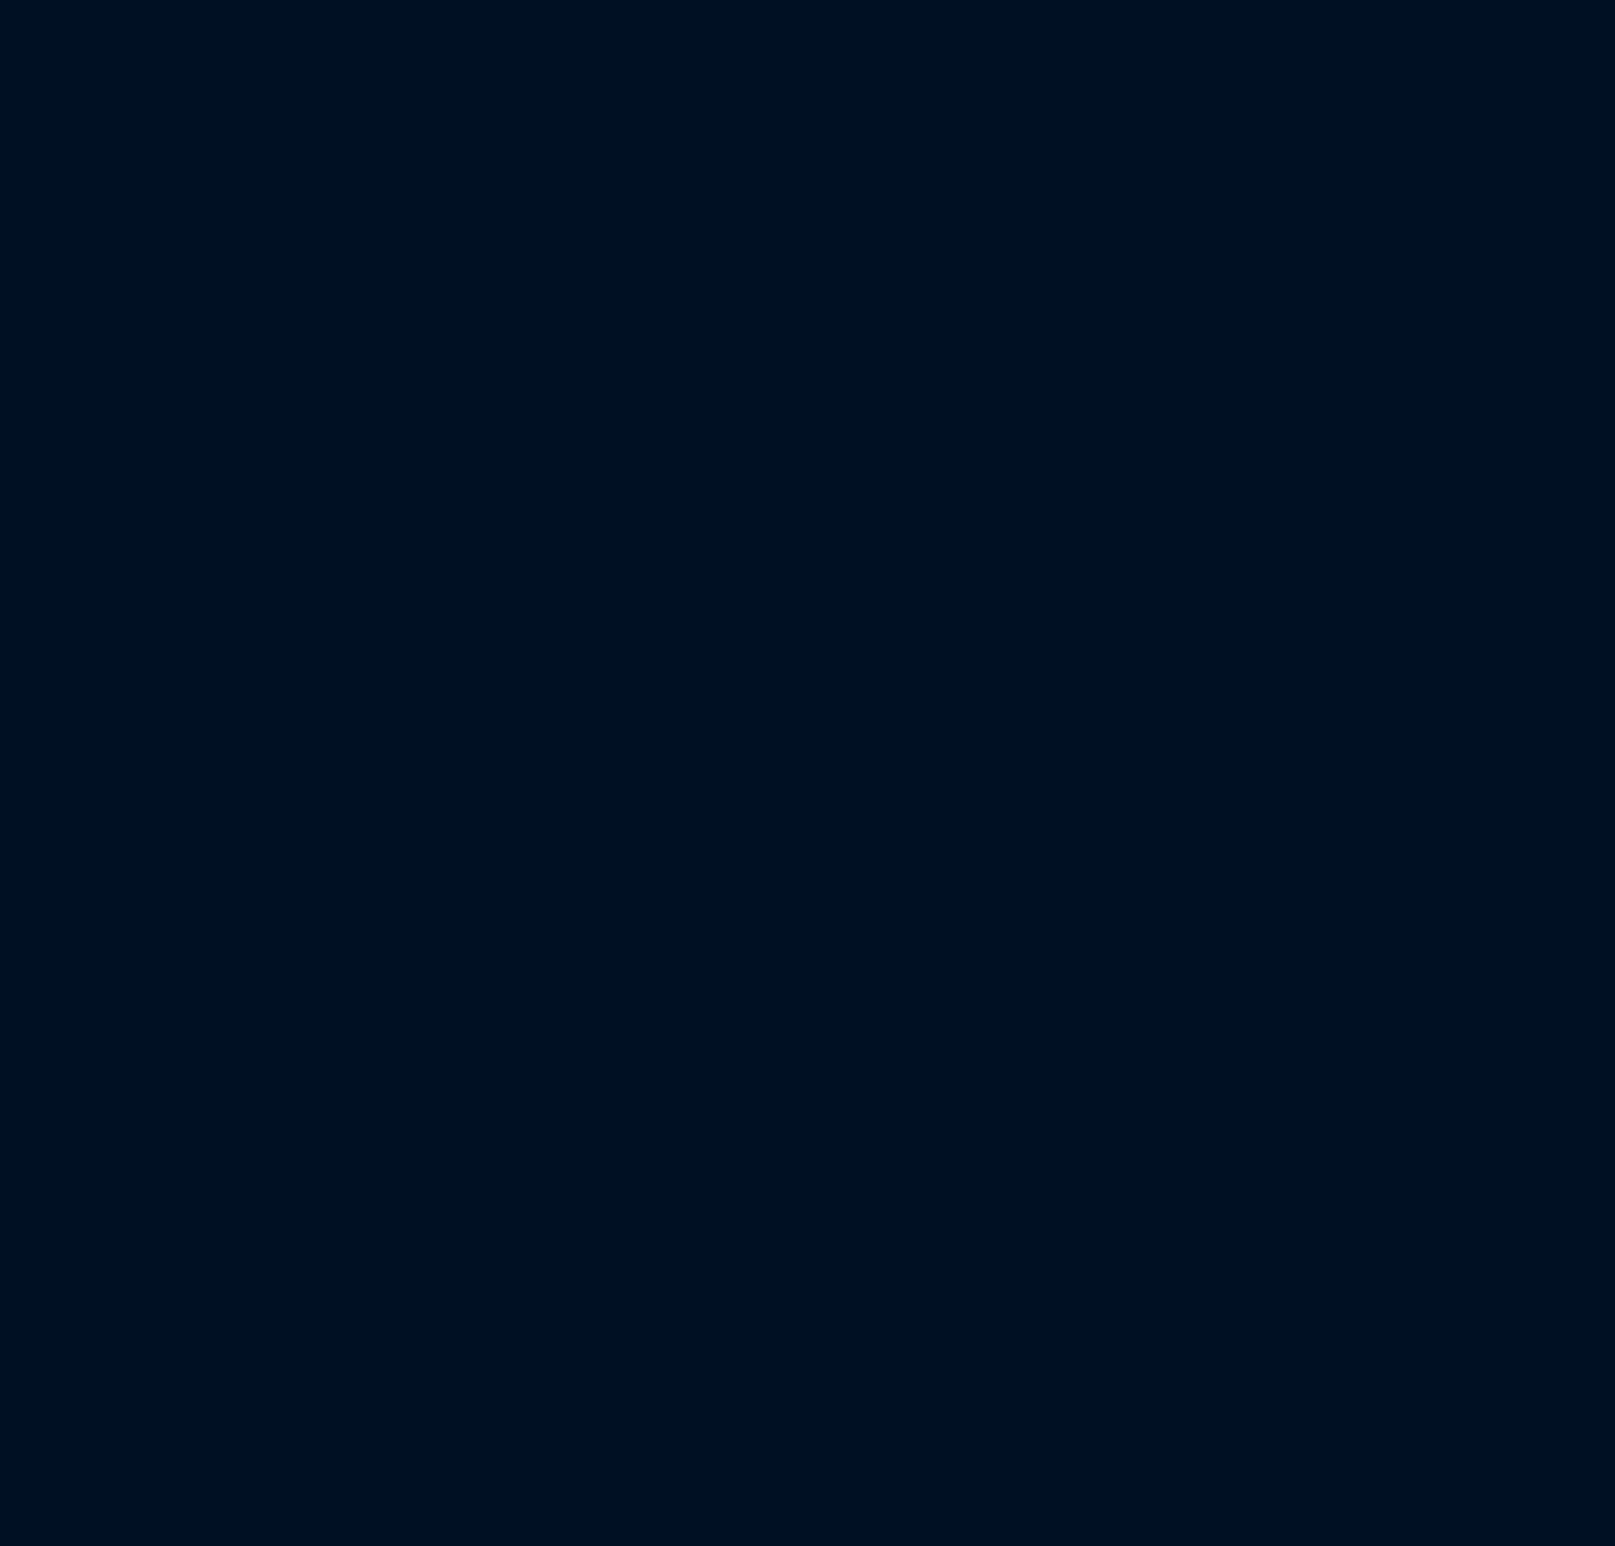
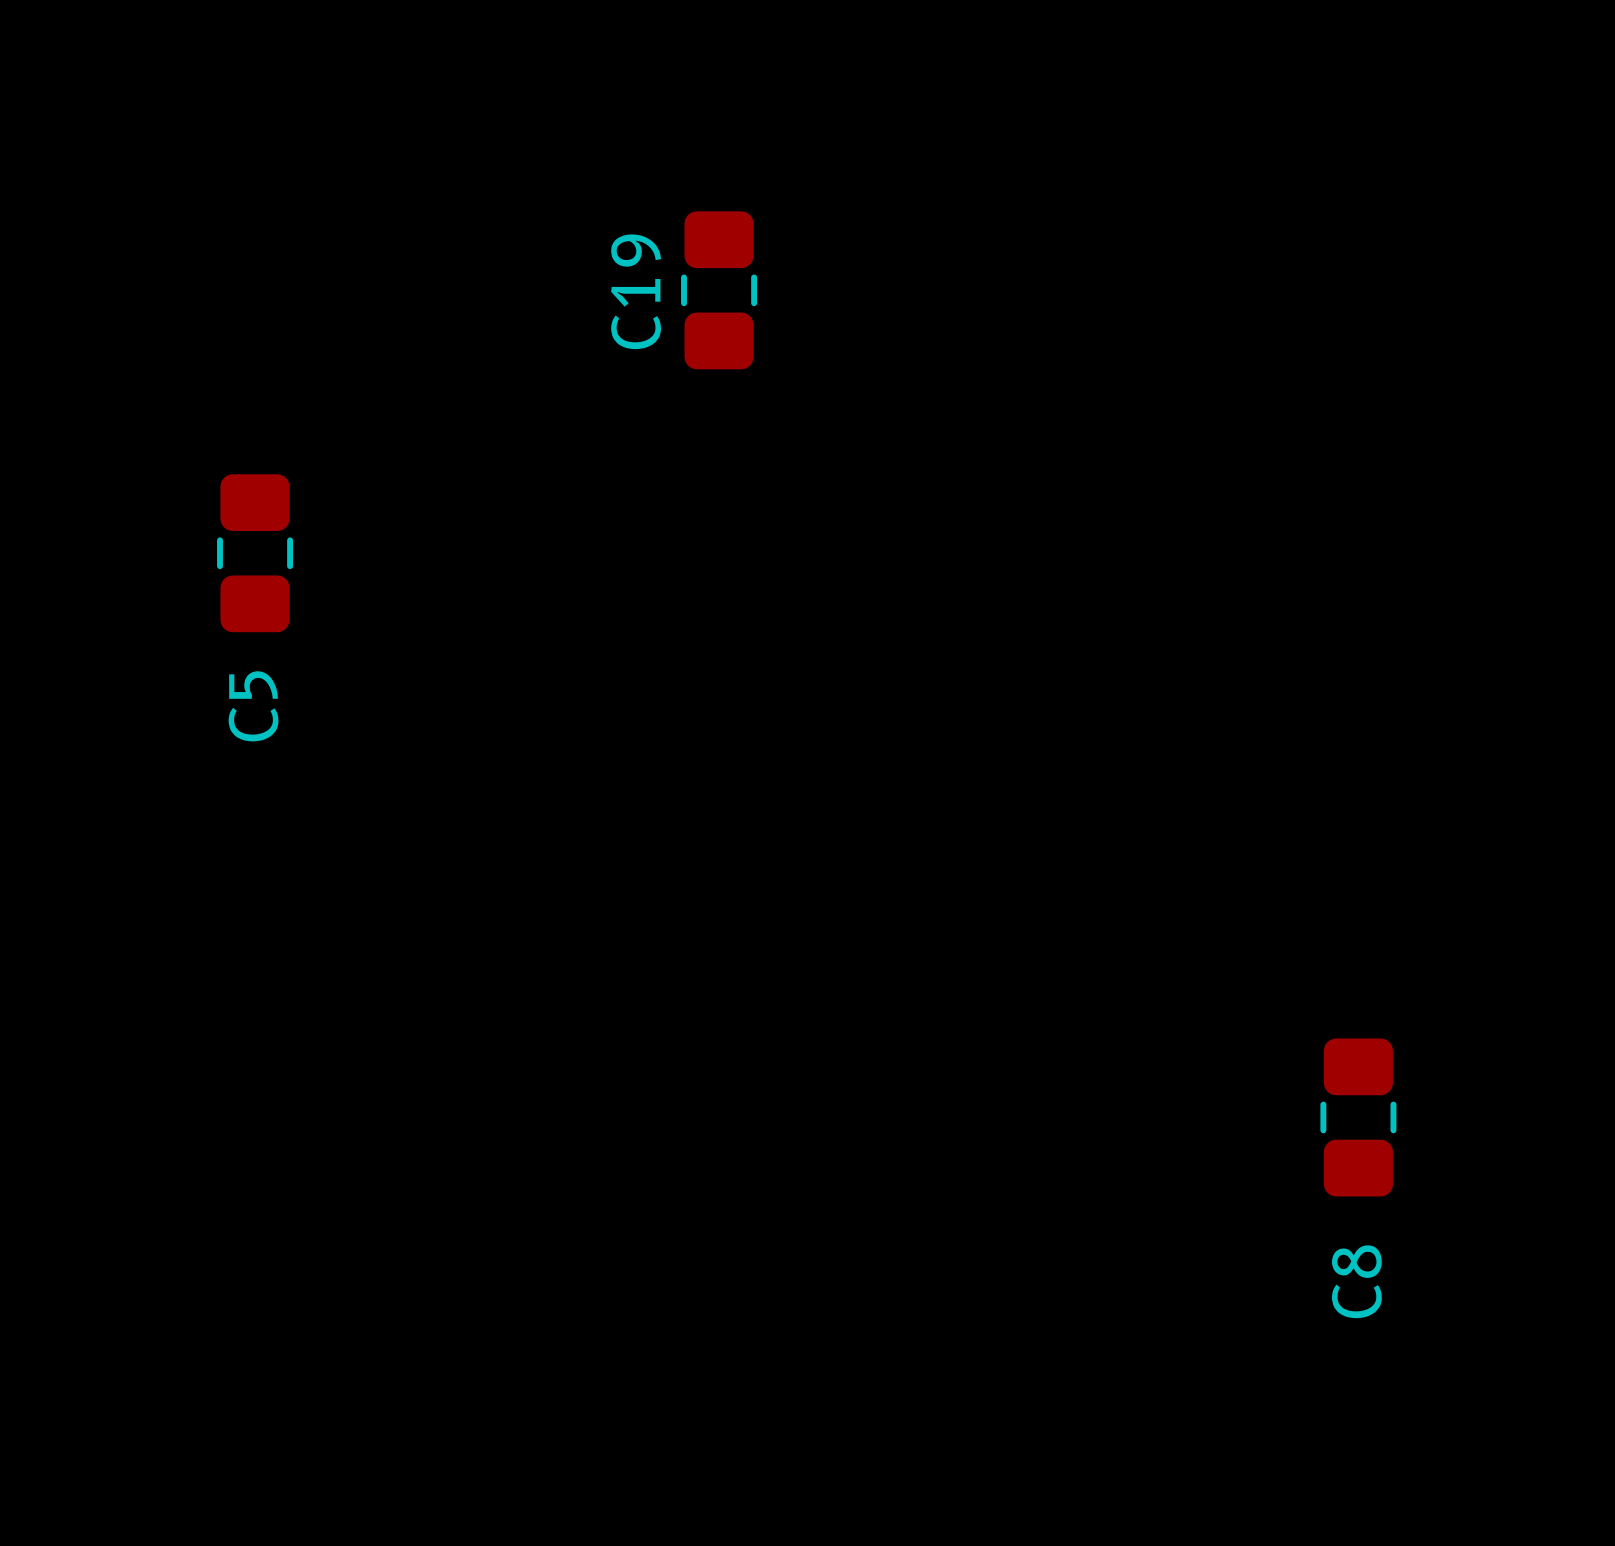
C19: none -> (719, 290)
C5: none -> (255, 553)
C8: none -> (1358, 1117)

